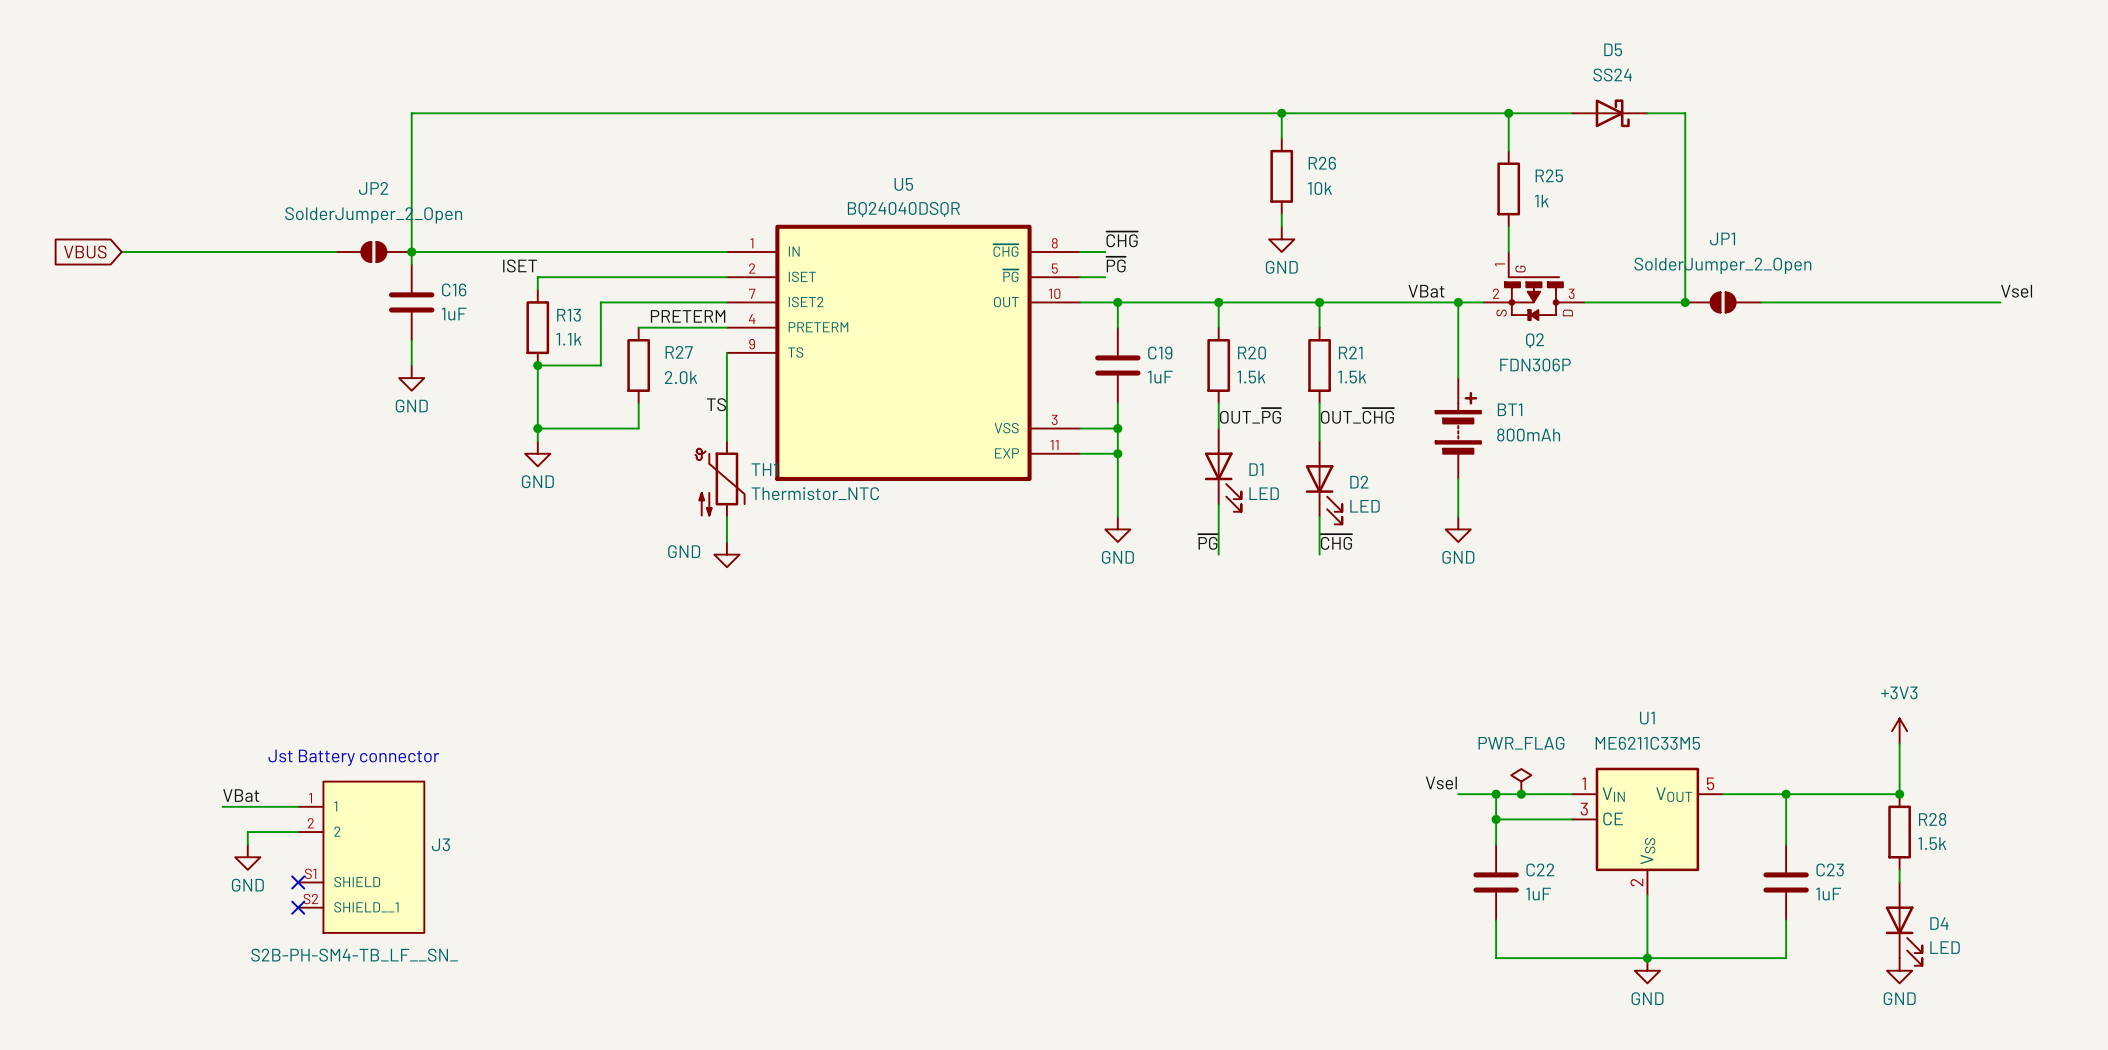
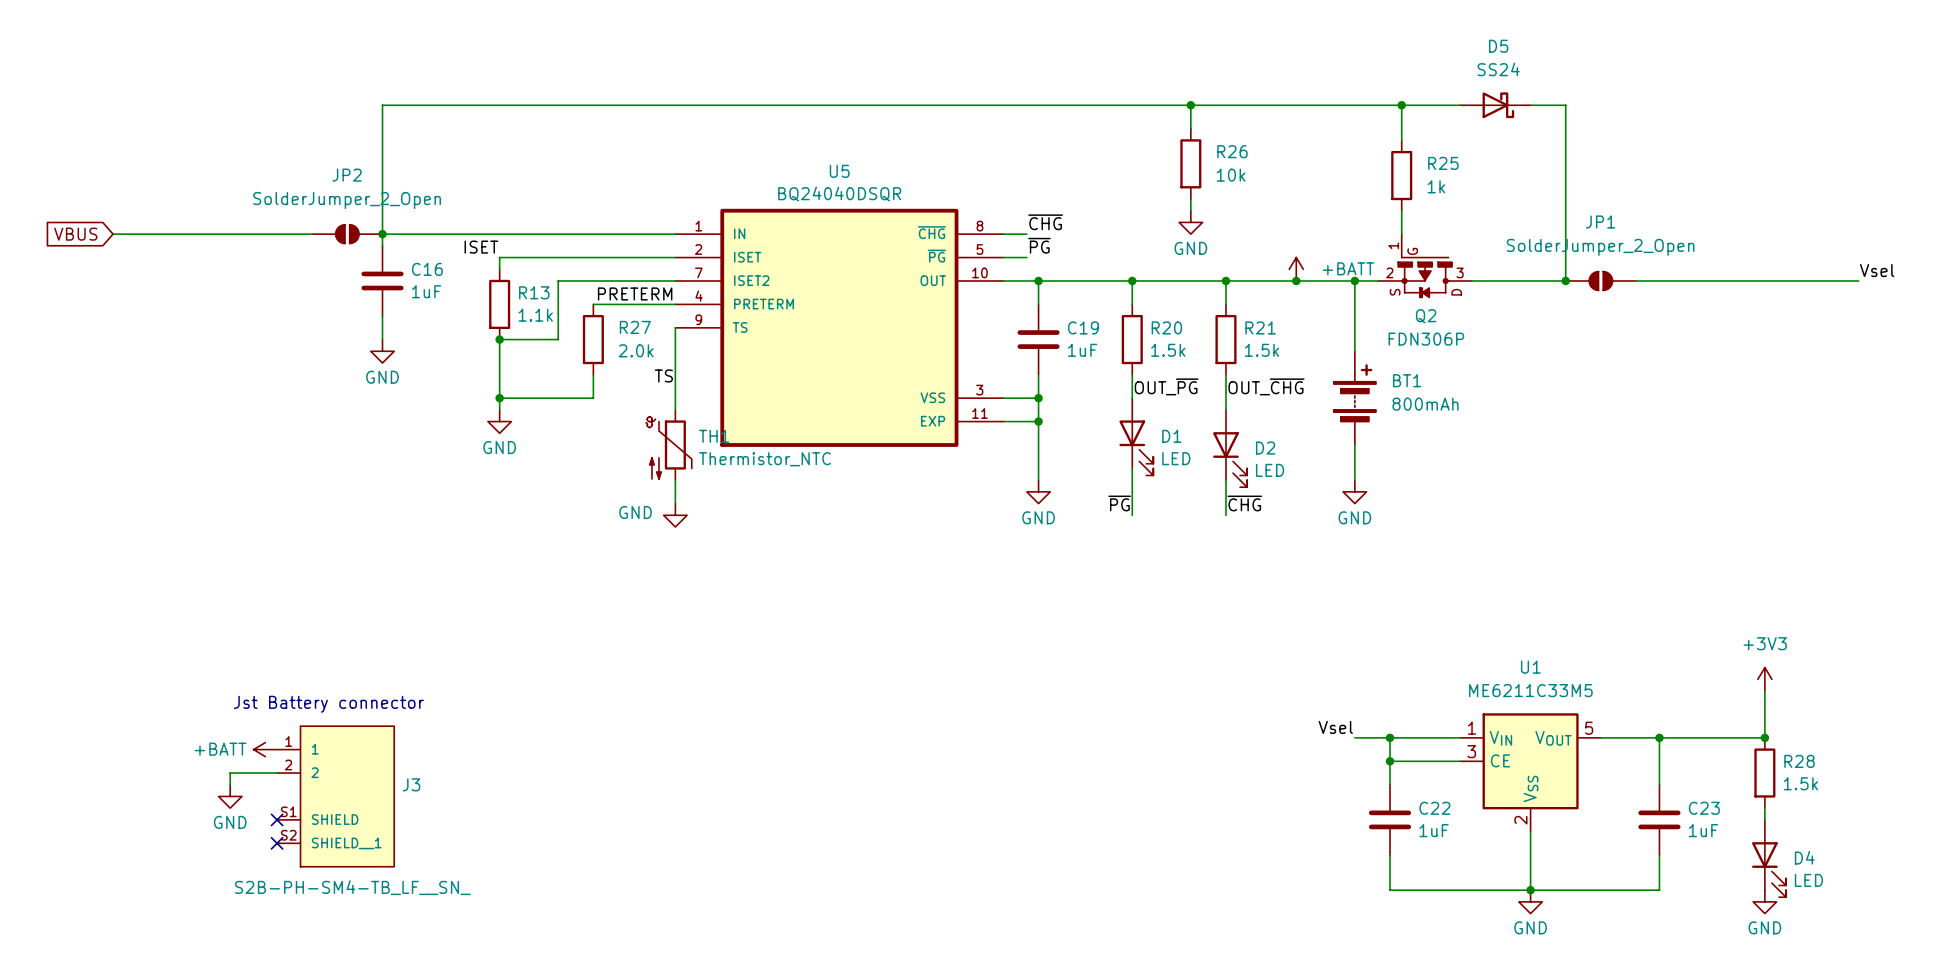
power symbol: none -> +BATT (1296, 269)
label: VBat (1426, 291) -> none
junction: none -> (1296, 280)
power symbol: PWR_FLAG (1521, 781) -> none
junction: (1521, 794) -> none
label: VBat (241, 795) -> none
wire: (222, 806) (298, 806) -> none
power symbol: none -> +BATT (265, 749)

